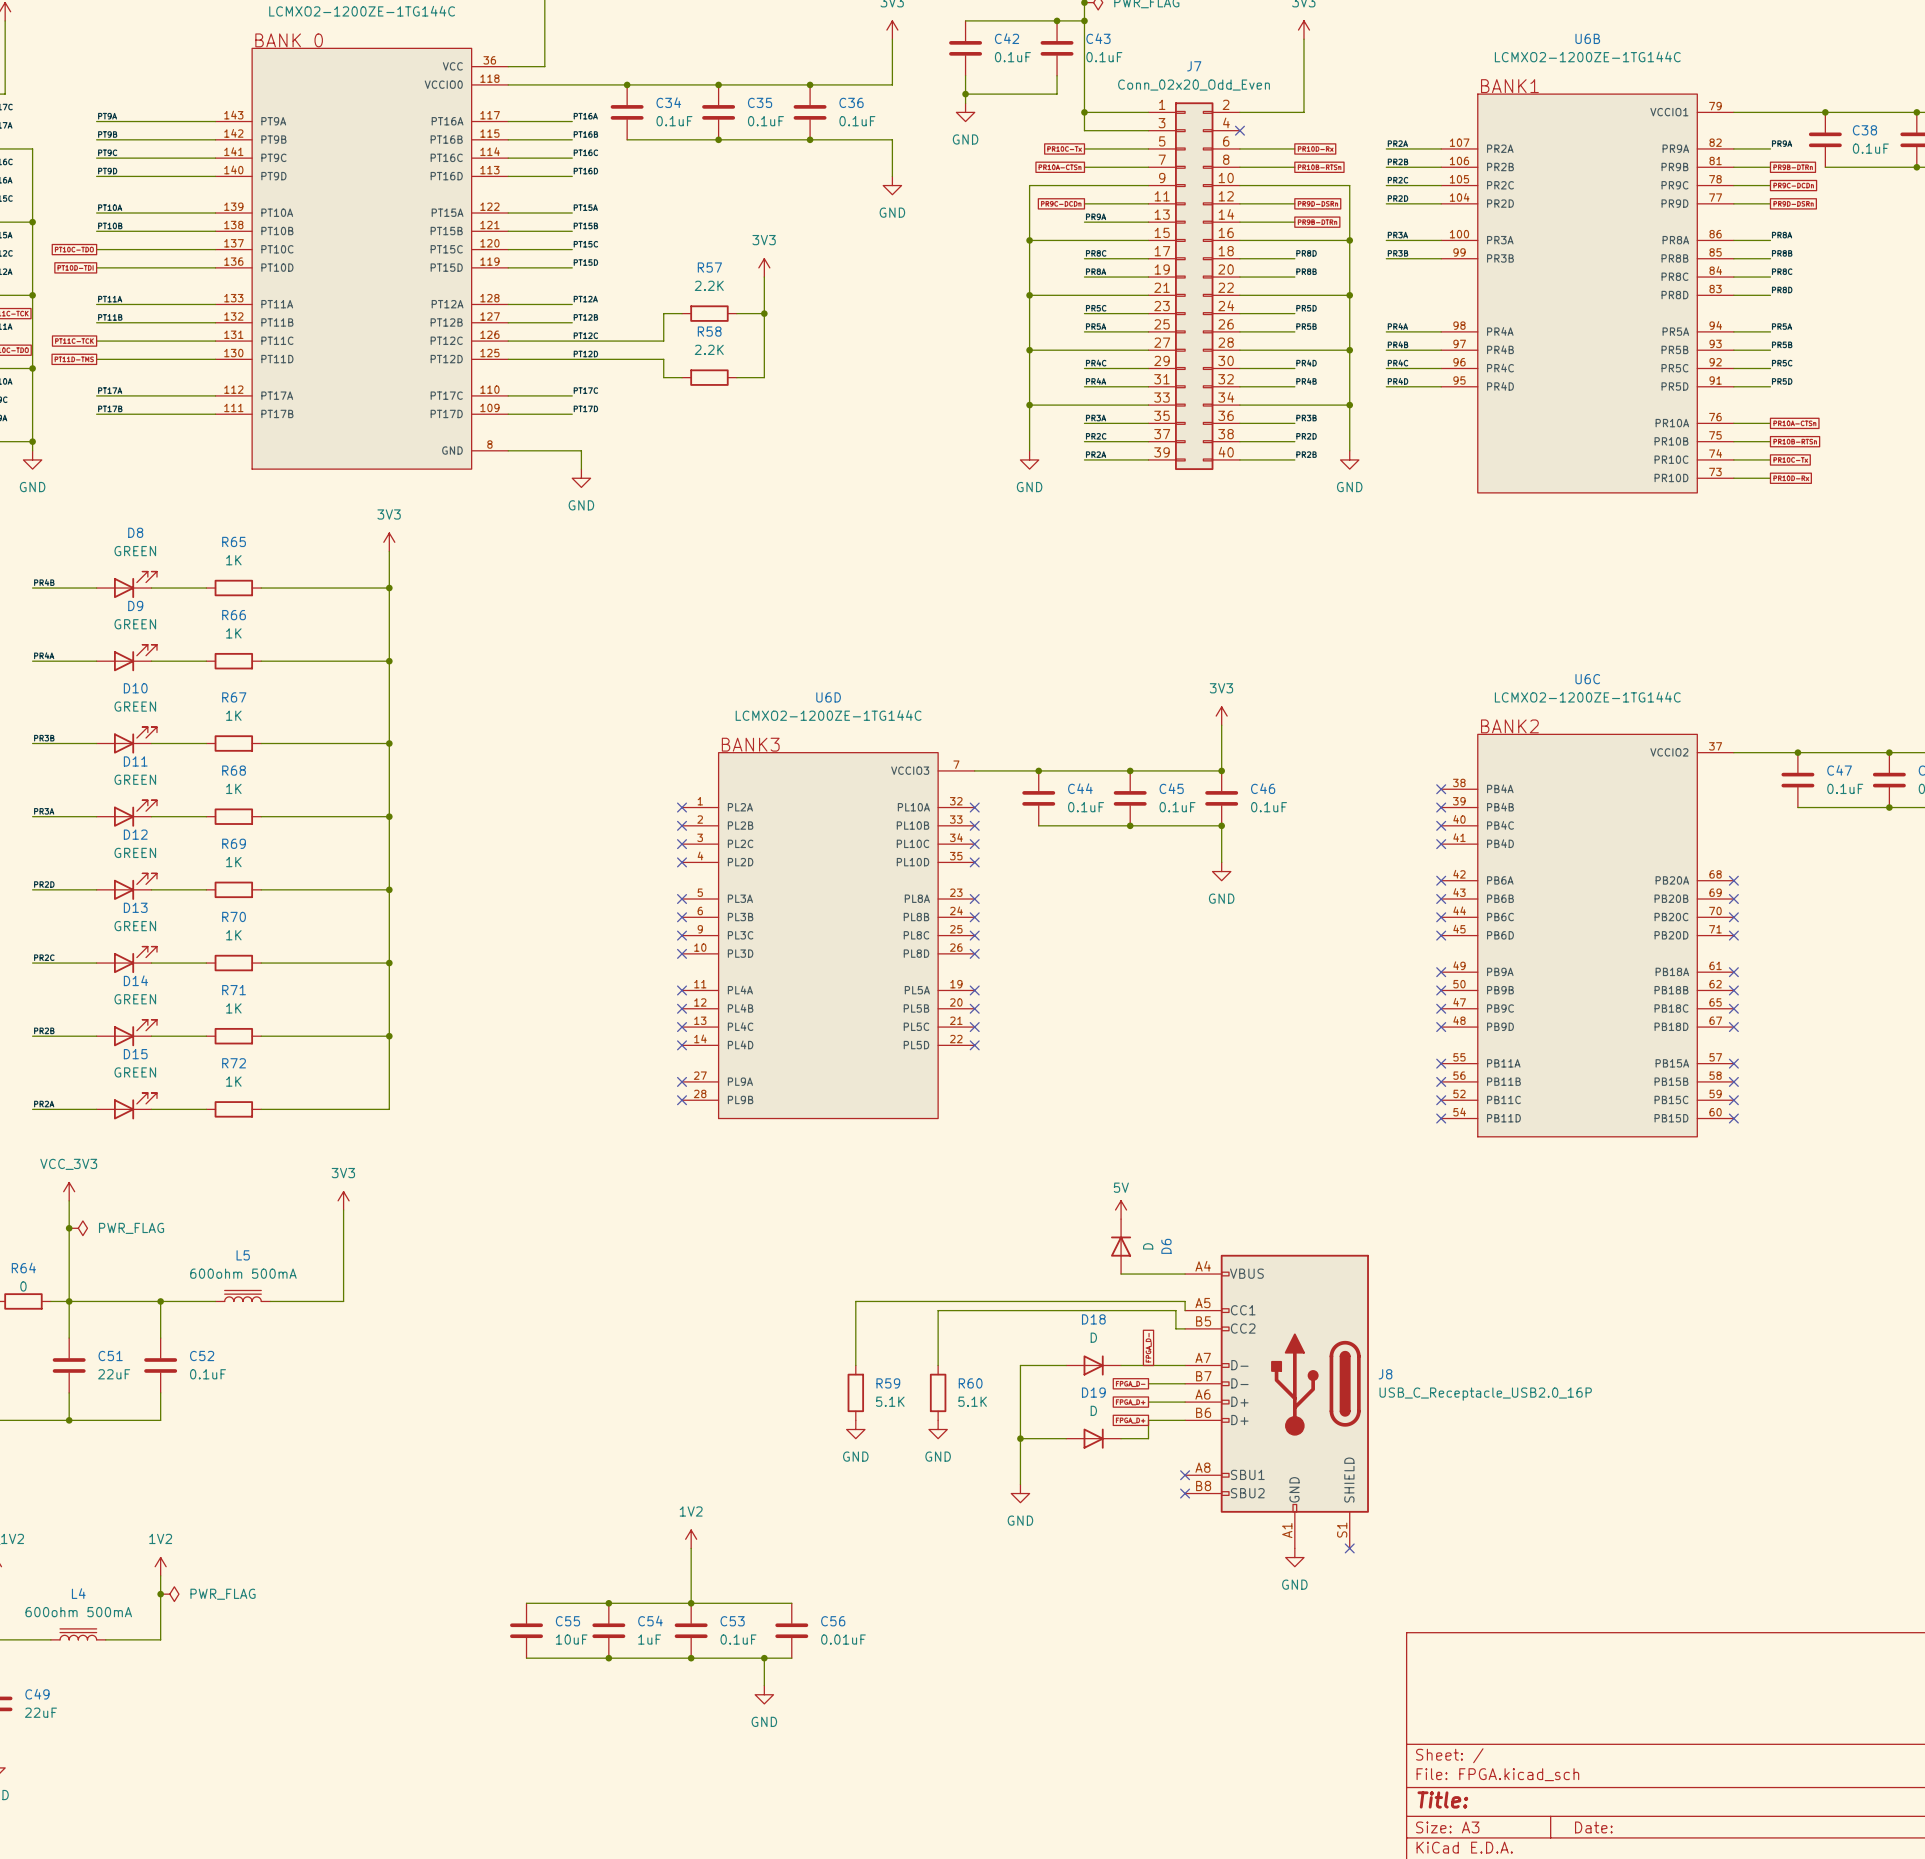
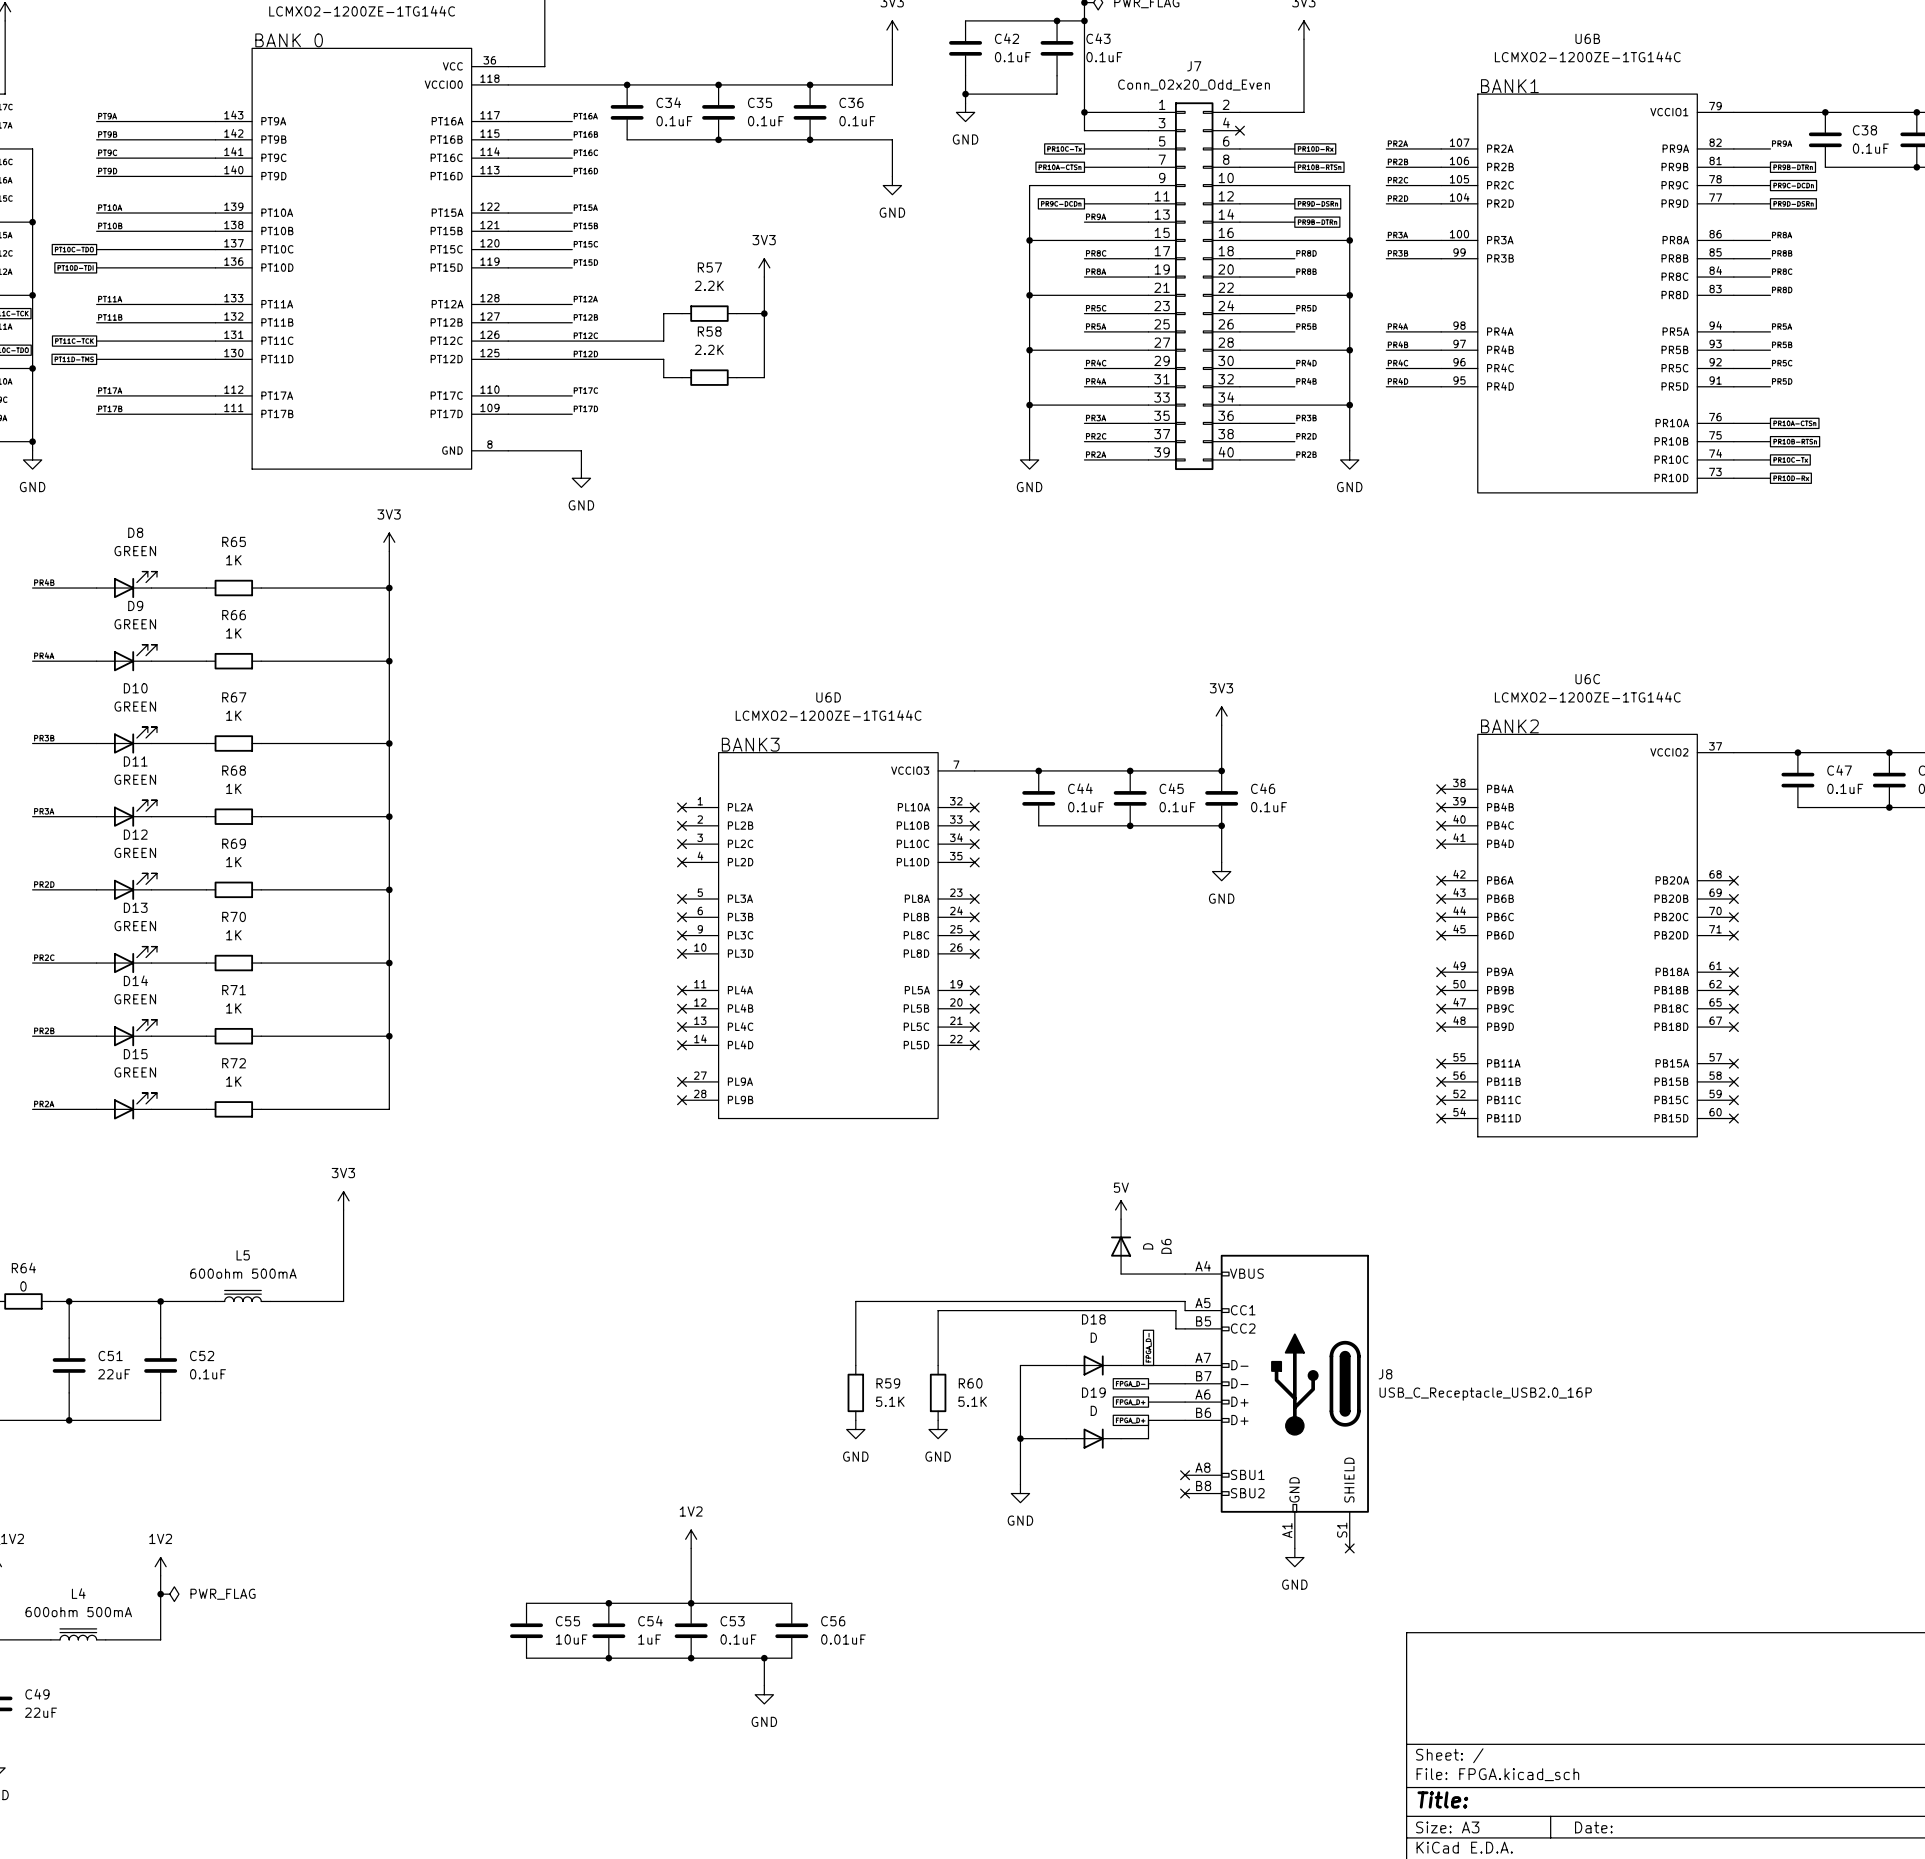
power symbol: VCC_3V3 (69, 1191) -> none
wire: (69, 1200) (69, 1301) -> none
junction: (69, 1228) -> none
power symbol: PWR_FLAG (78, 1228) -> none

